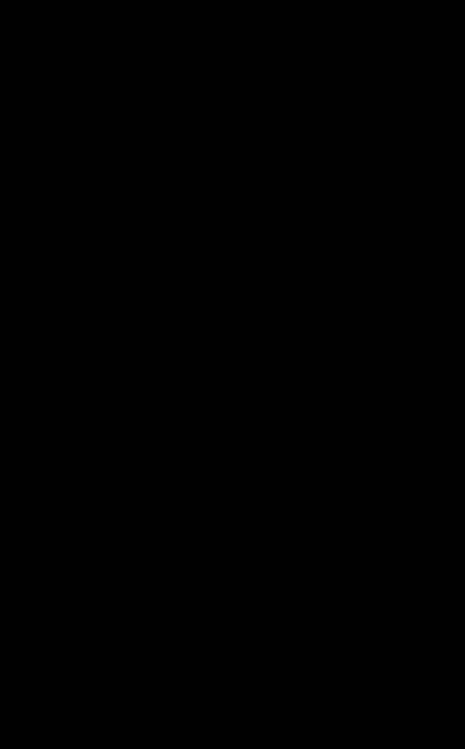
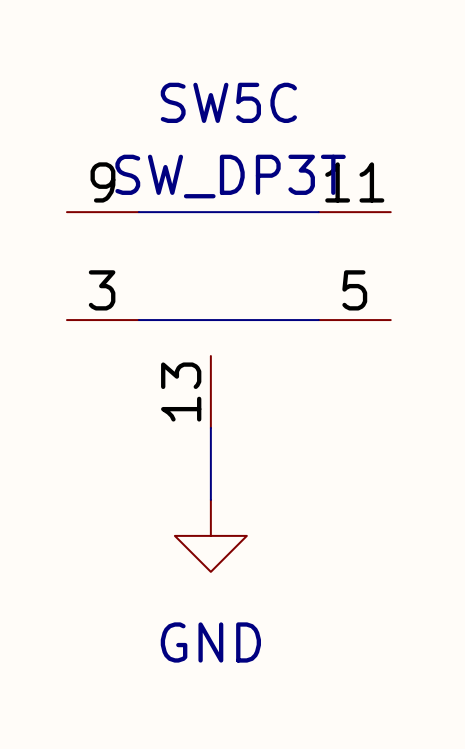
wire: none -> (138, 212) (318, 212)
wire: none -> (138, 320) (318, 320)
SW5C: none -> SW_DP3T (228, 320)
wire: none -> (210, 427) (210, 499)
power symbol: none -> GND (210, 535)

